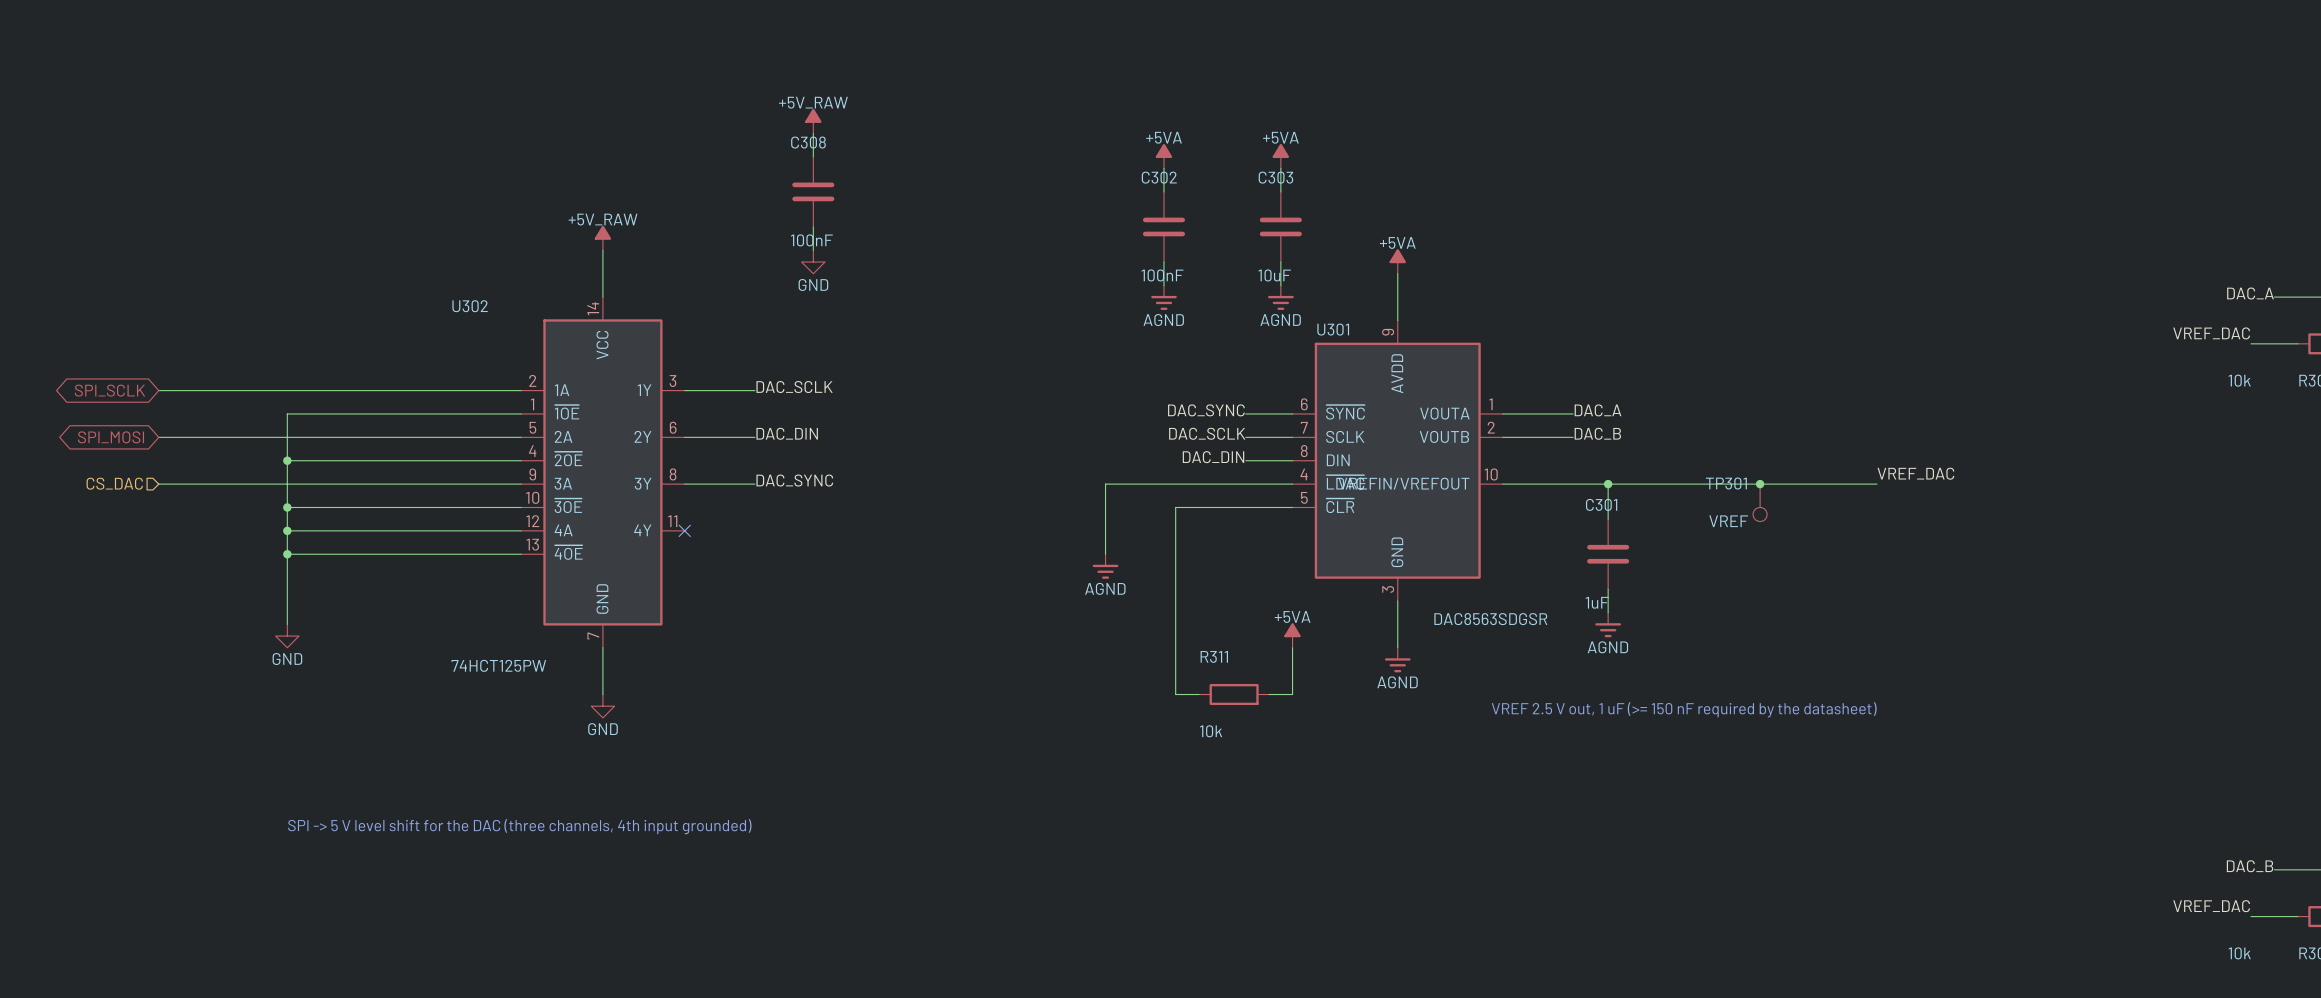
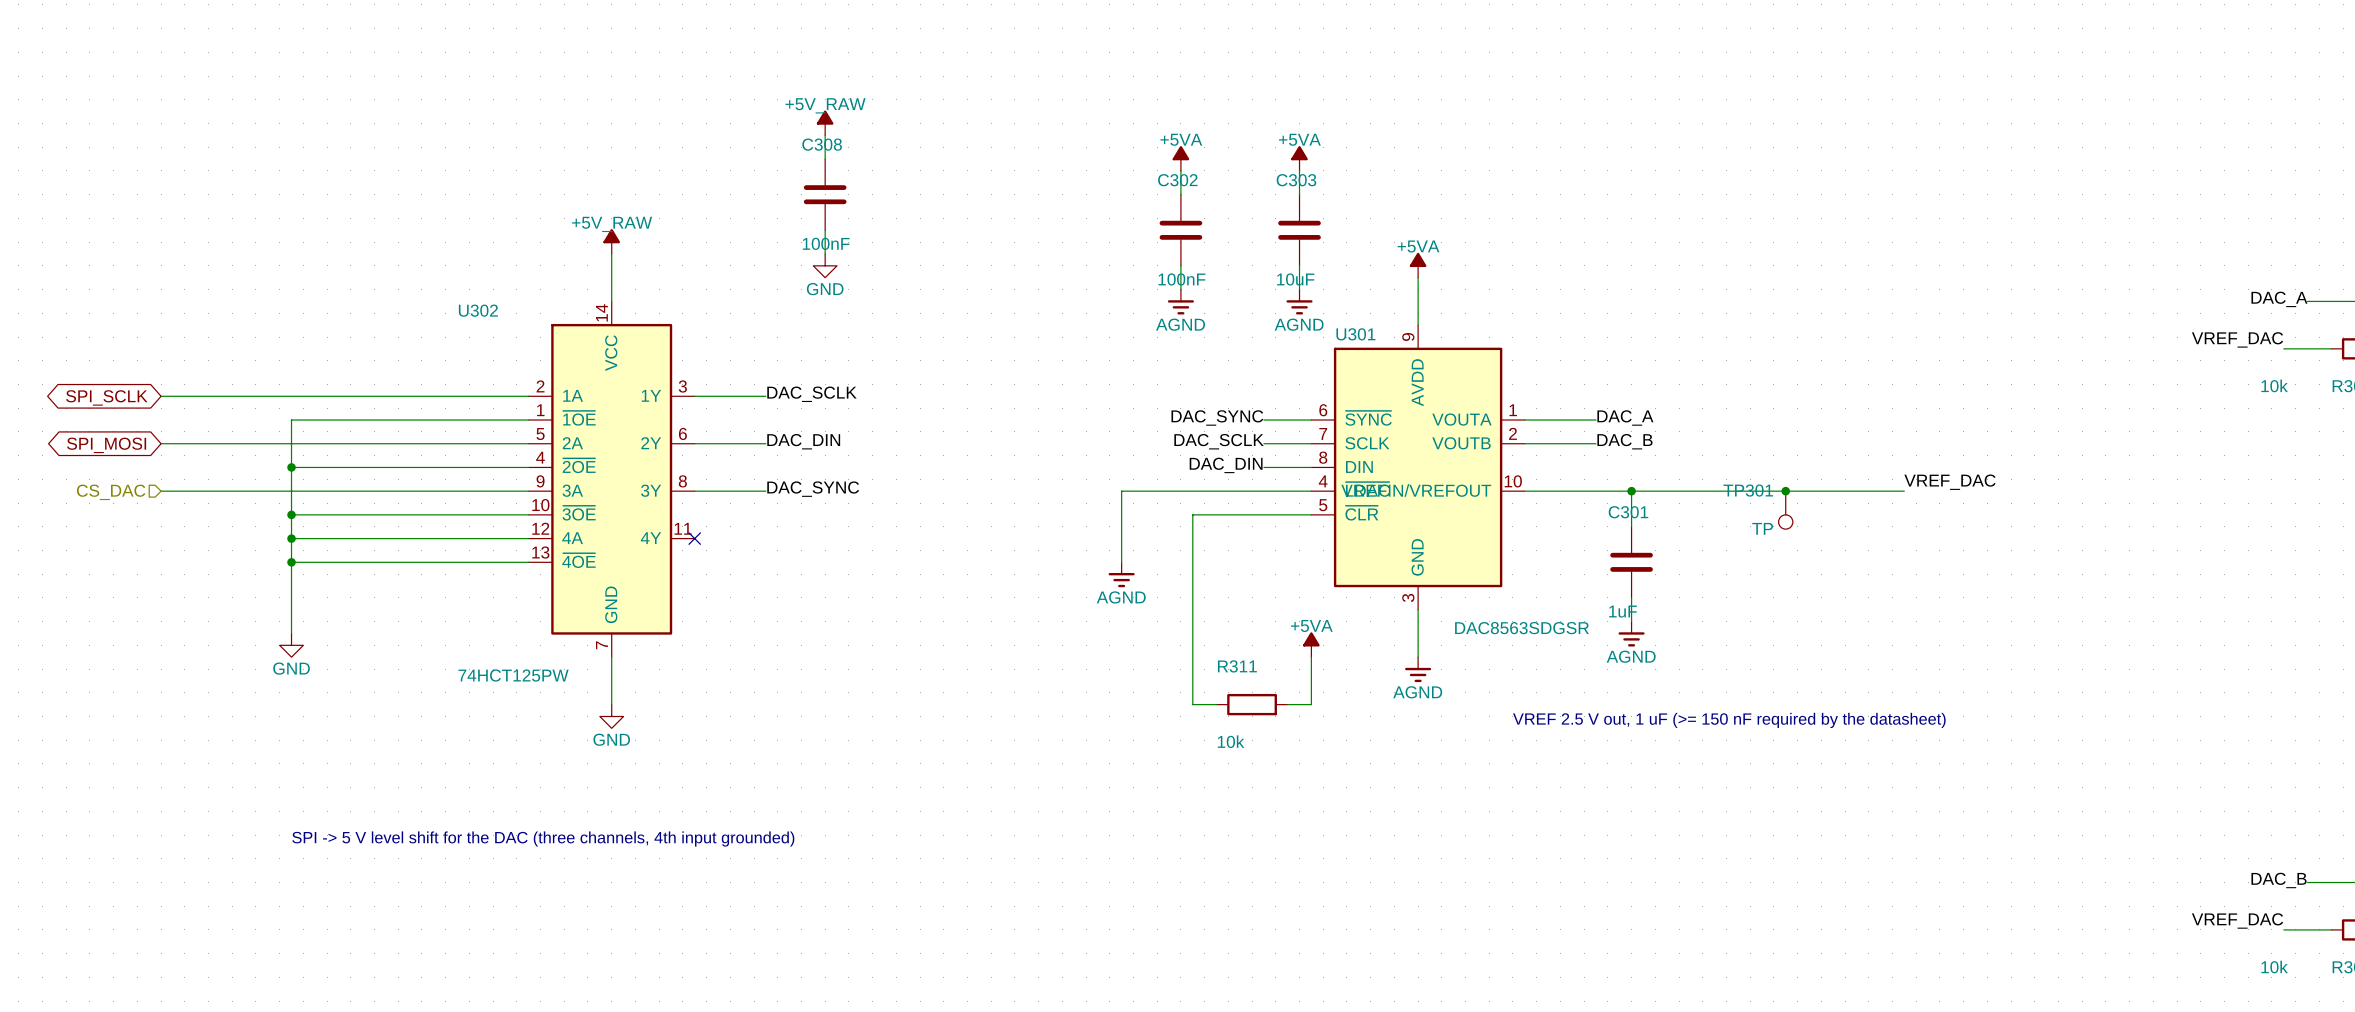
TP301 value: VREF (1728, 521) -> TP (1762, 528)

